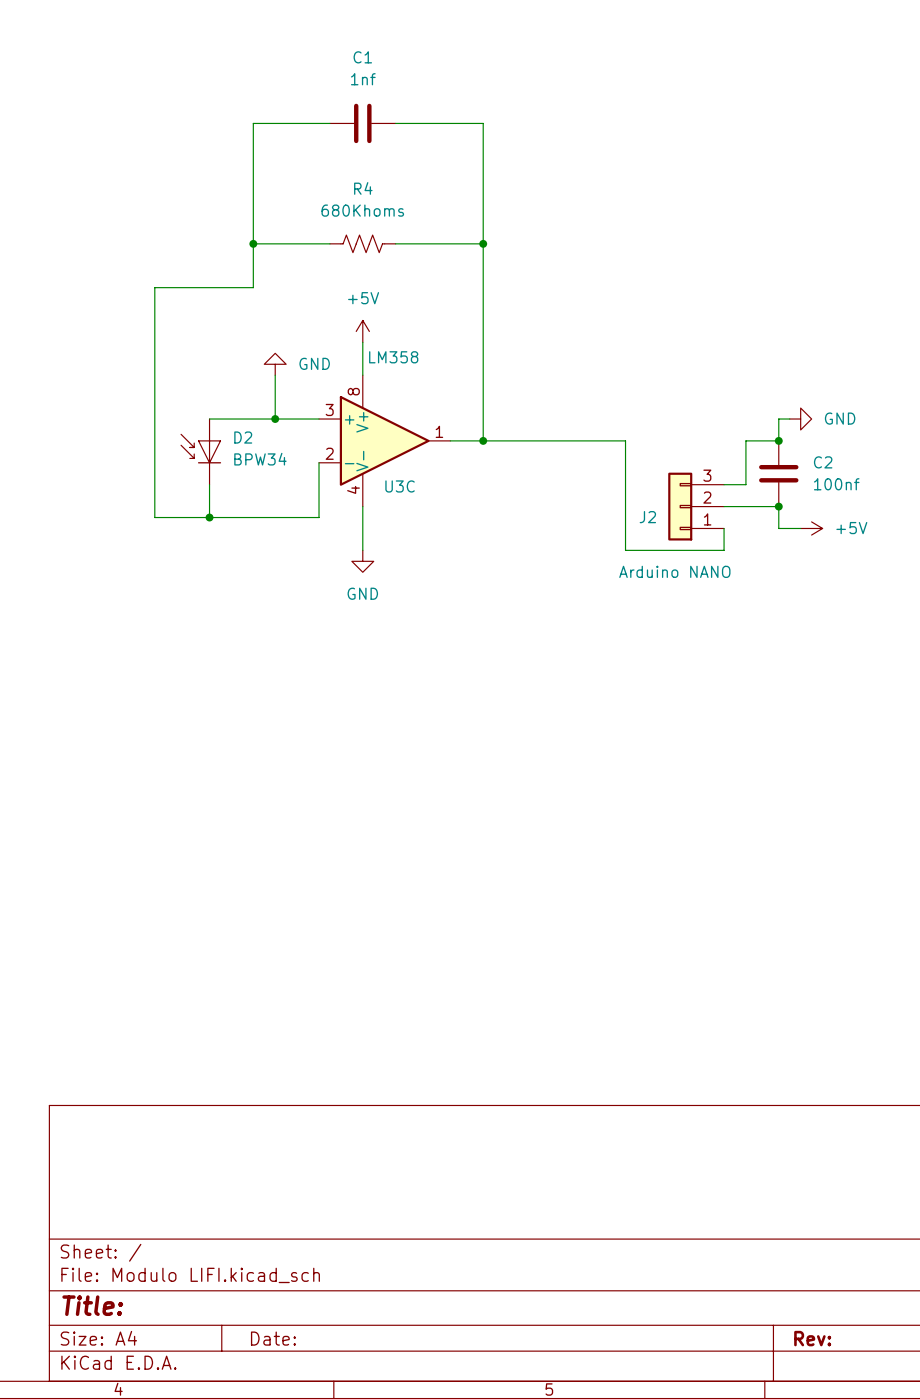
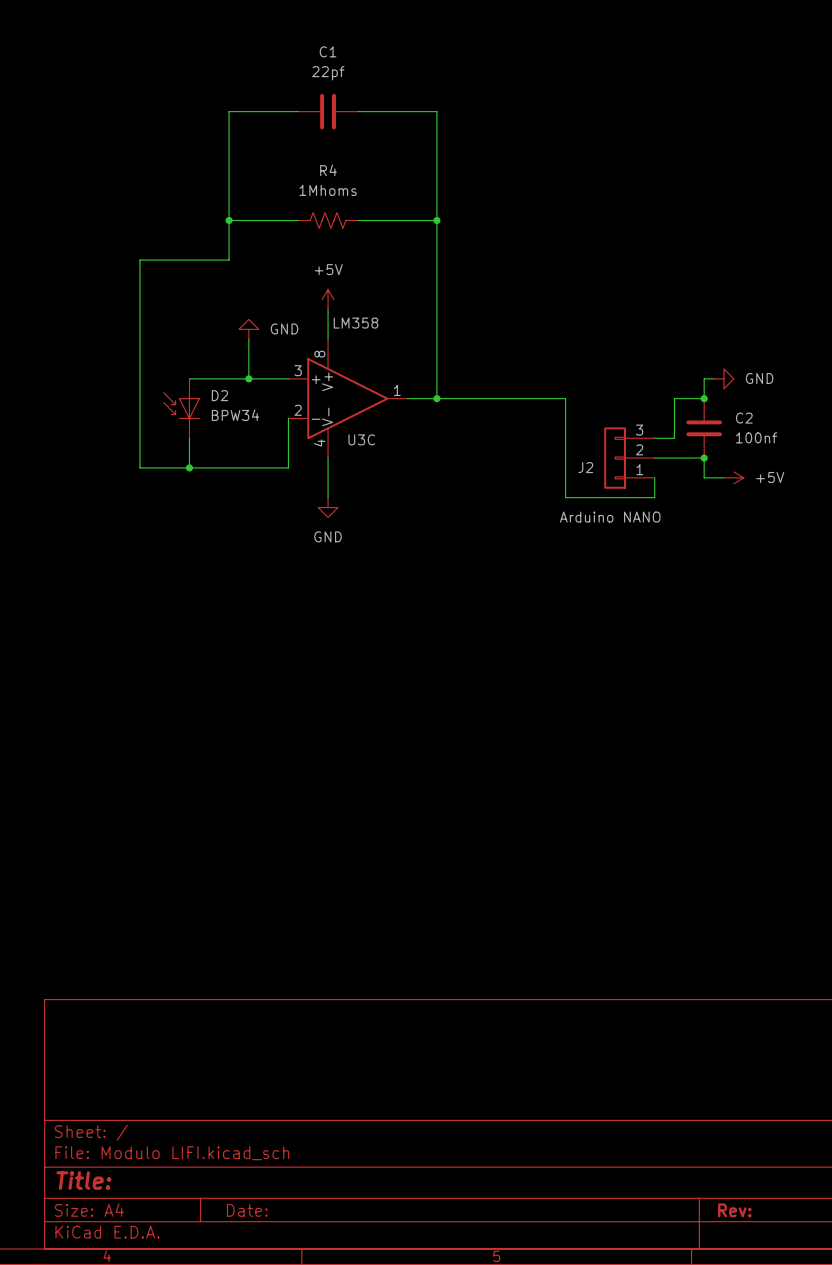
C1 value: 1nf (363, 79) -> 22pf (328, 73)
R4 value: 680Khoms (362, 210) -> 1Mhoms (328, 190)

